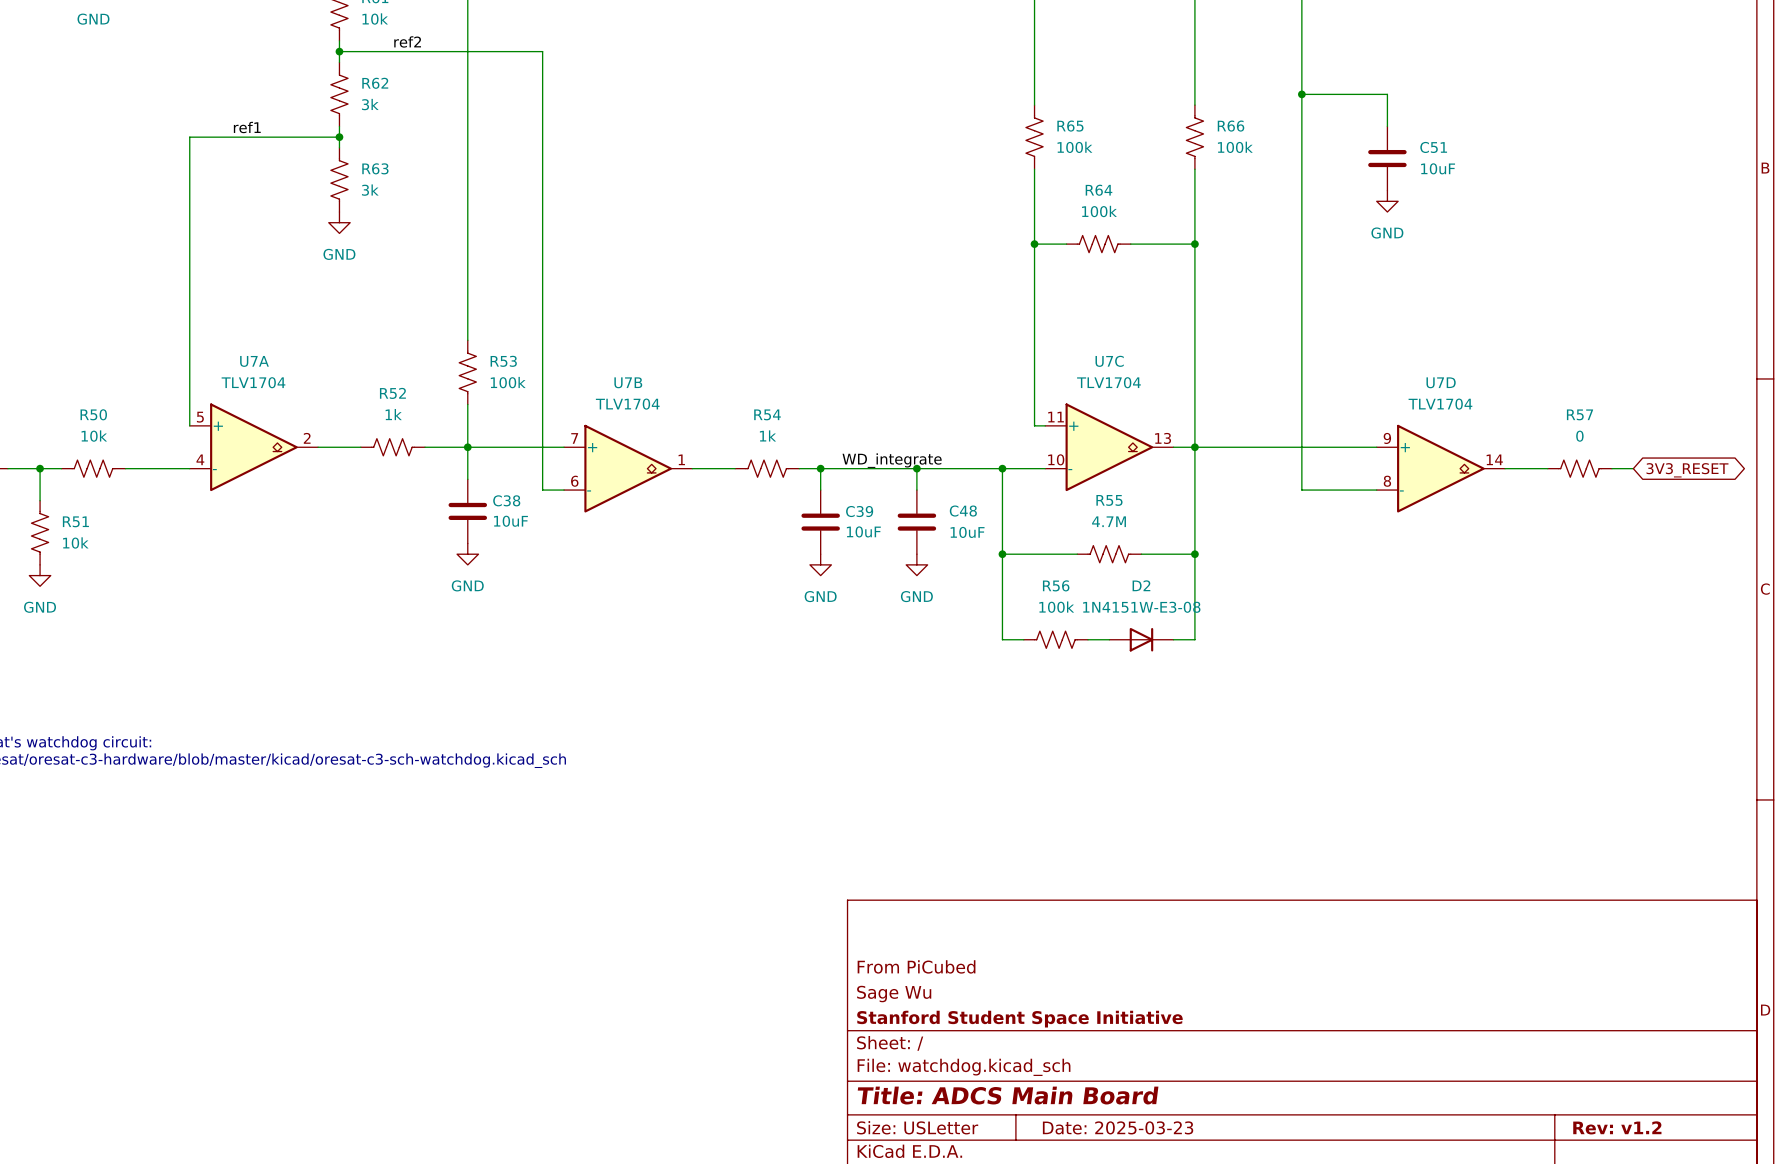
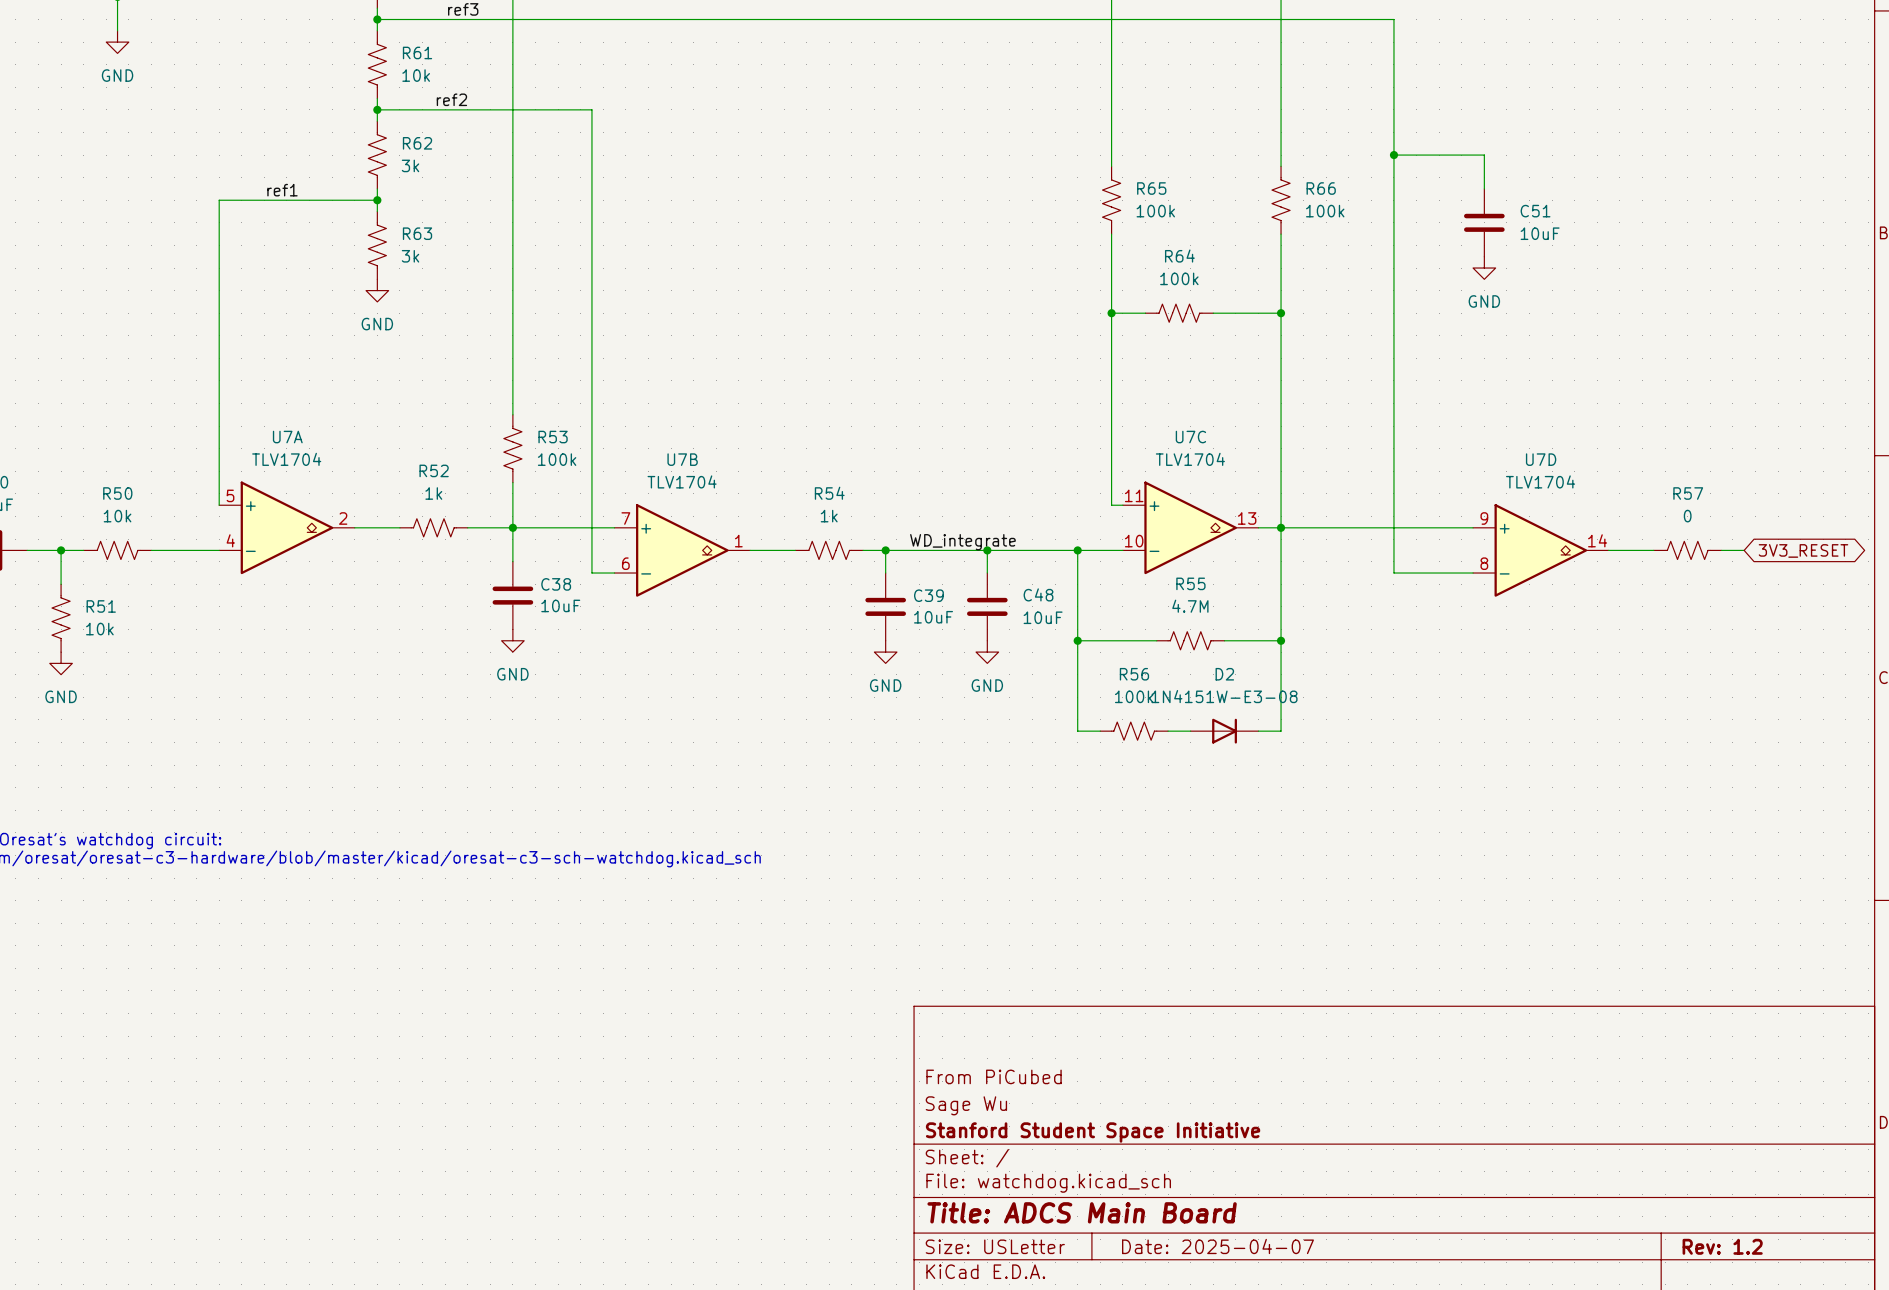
title block: Date: 2025-03-23 (1118, 1127) -> Date: 2025-04-07 (1217, 1246)
title block: Rev: v1.2 (1617, 1127) -> Rev: 1.2 (1722, 1246)

